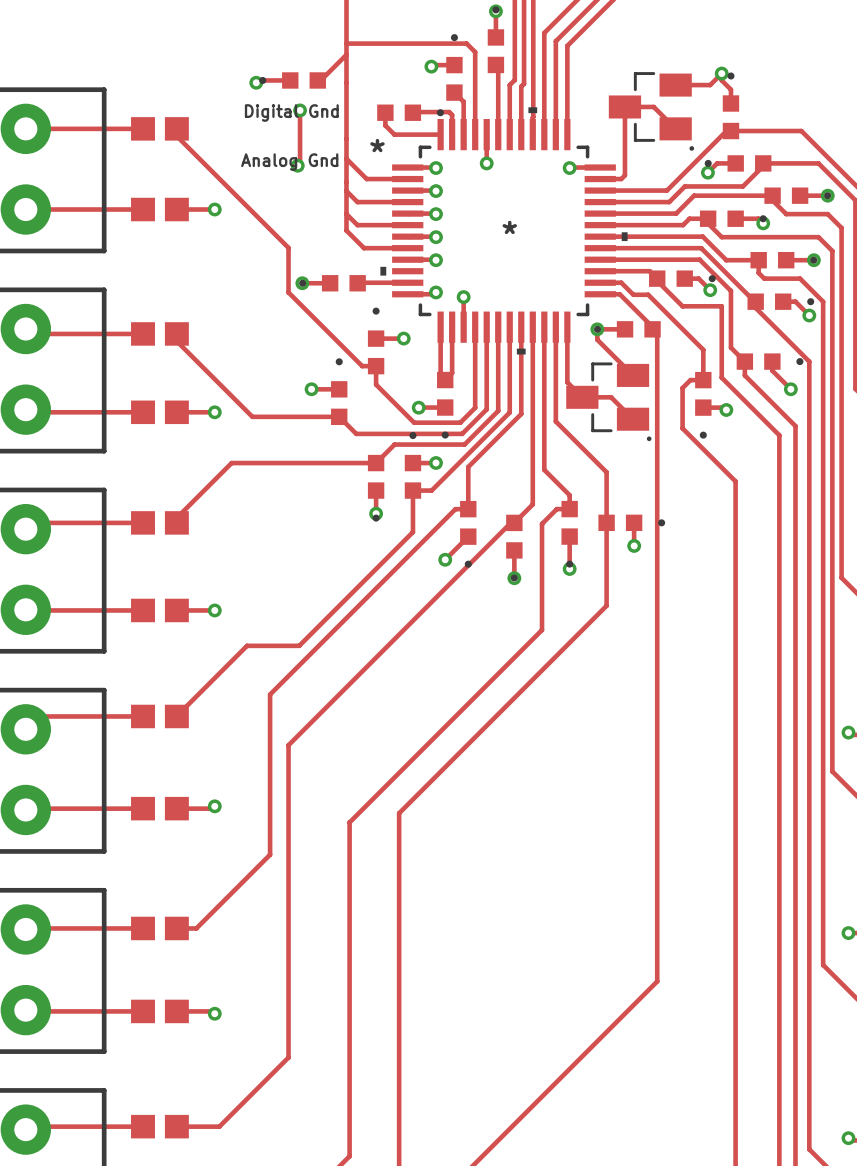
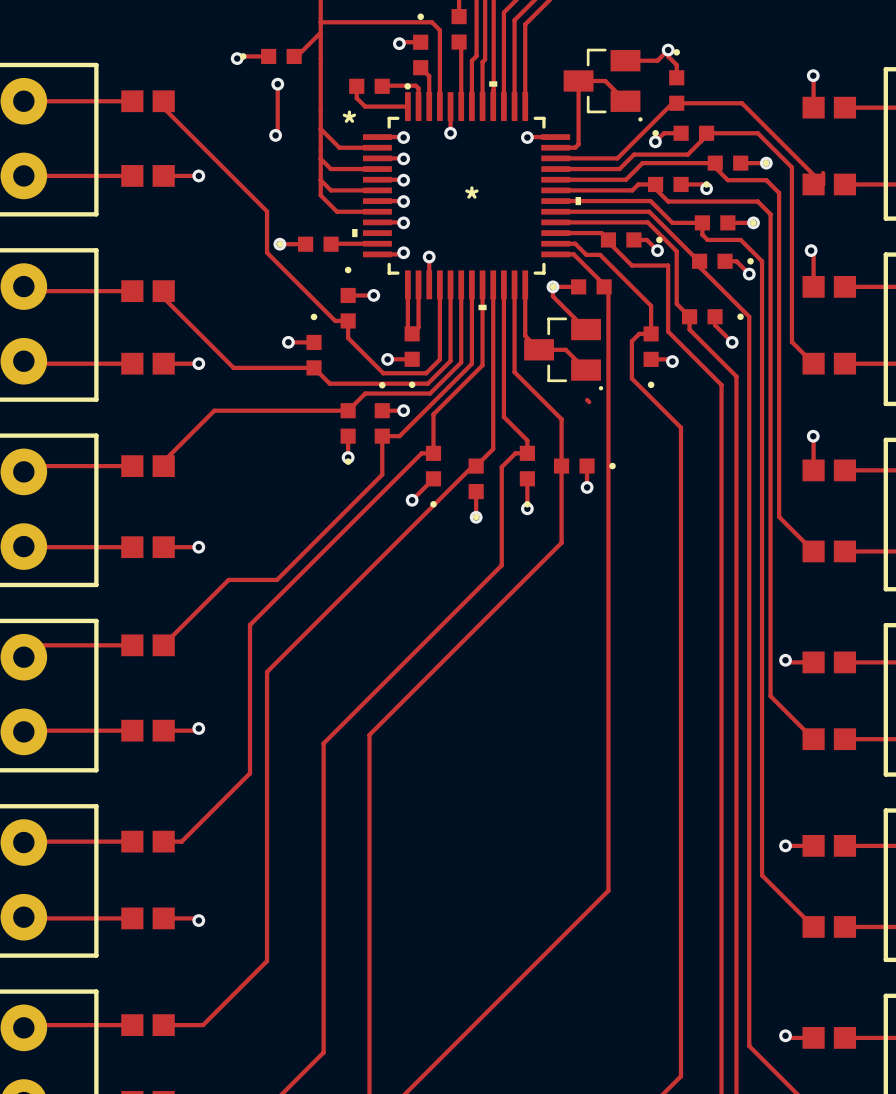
text: Digital Gnd (291, 113) -> none
text: Analog Gnd (289, 162) -> none
track: none -> (587, 399) (589, 402)

